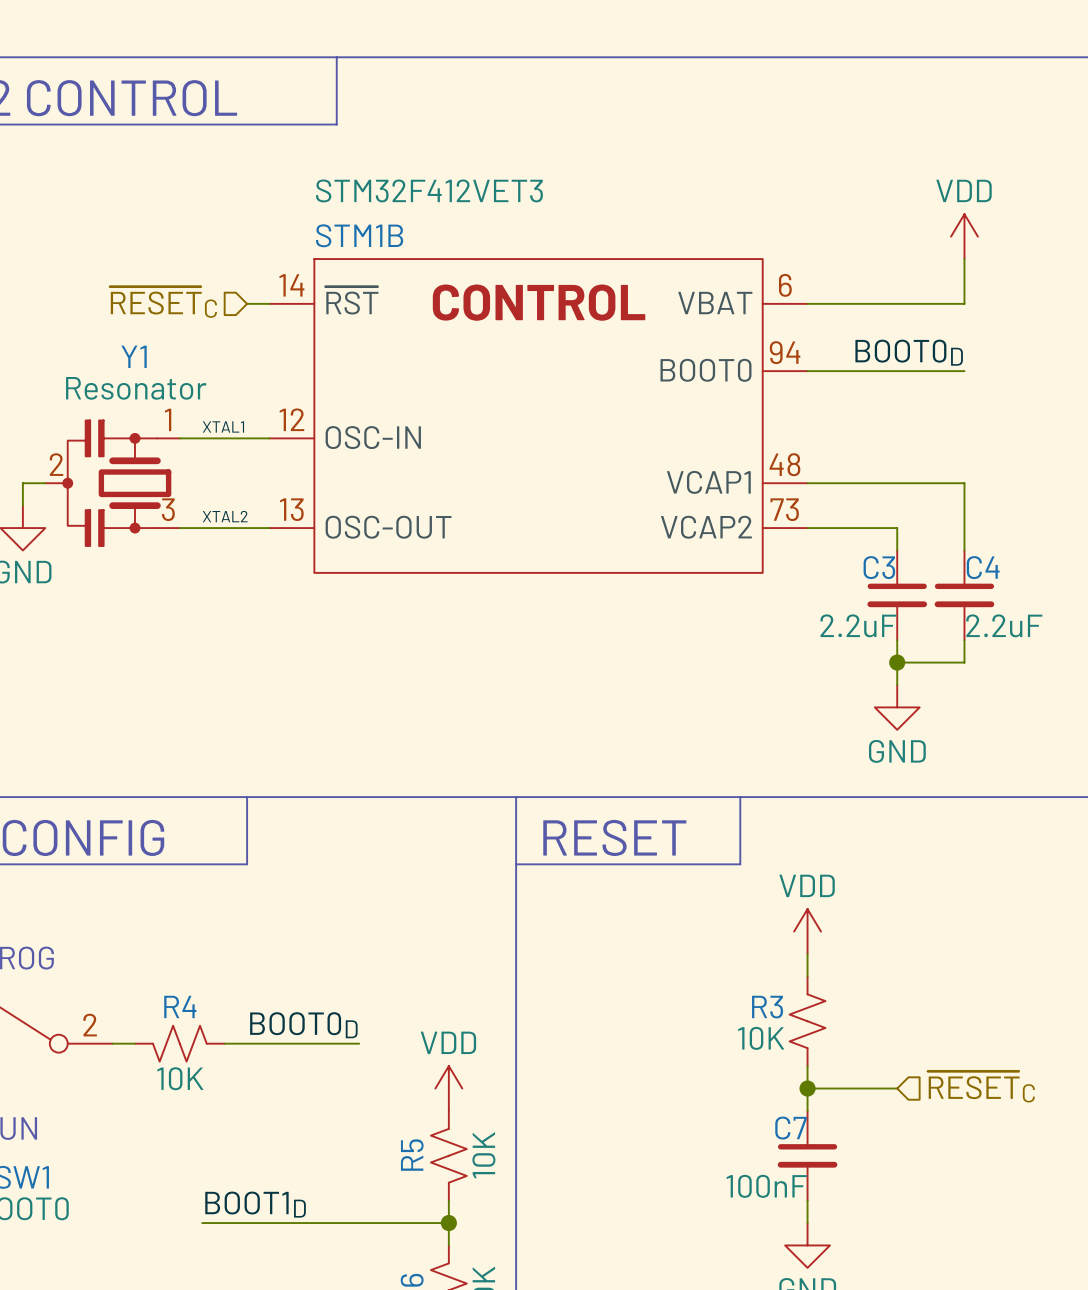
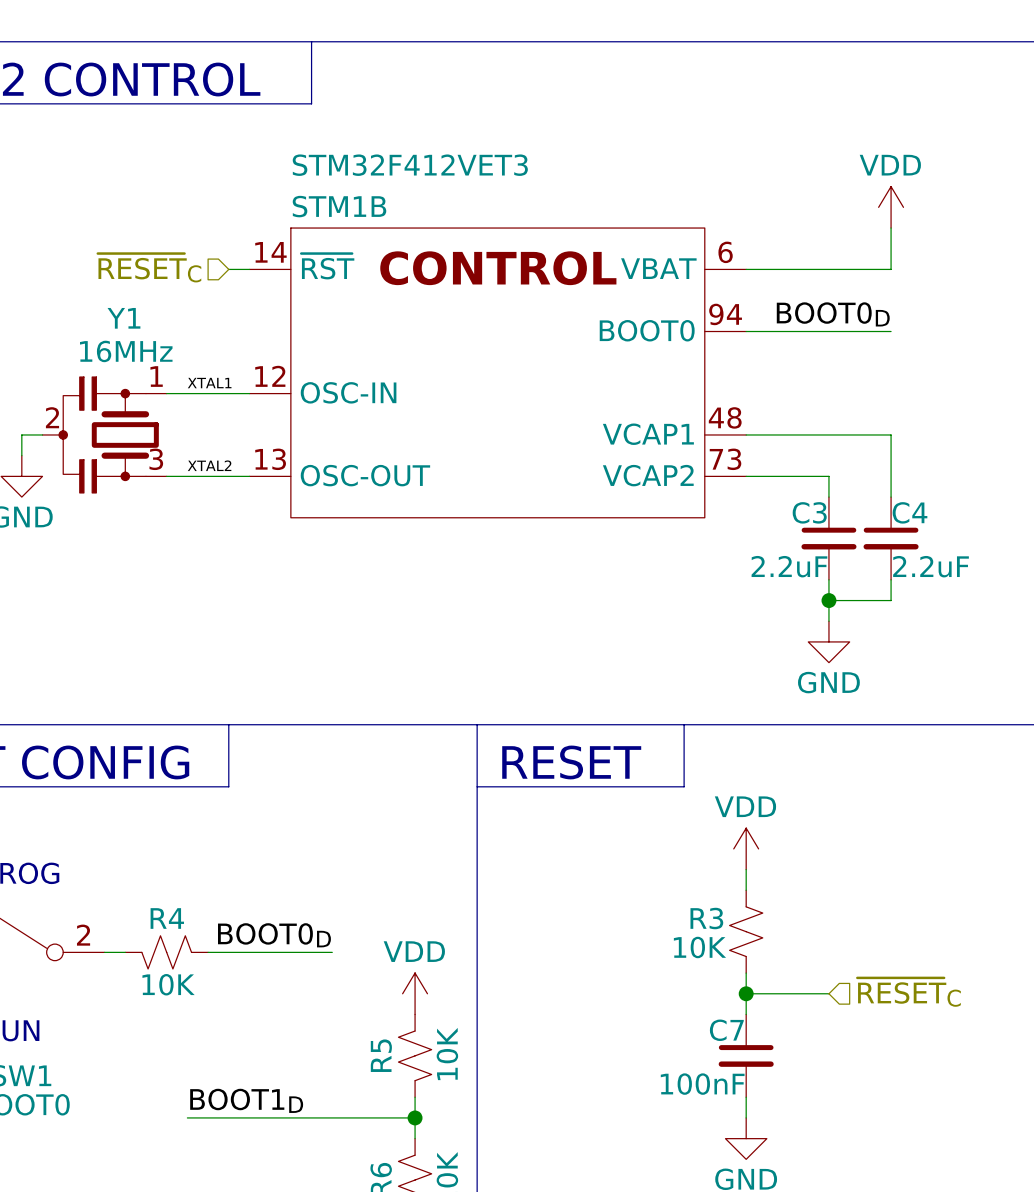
Y1 value: Resonator (136, 388) -> 16MHz (126, 351)

